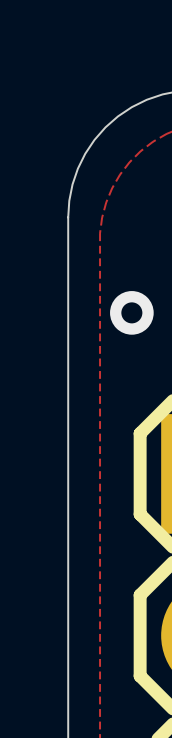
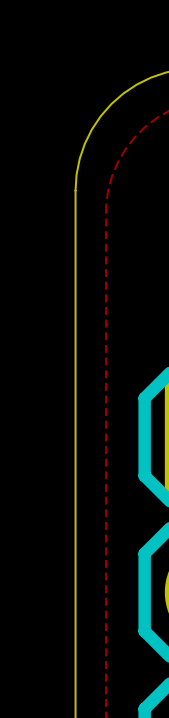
via: (131, 312) -> none

